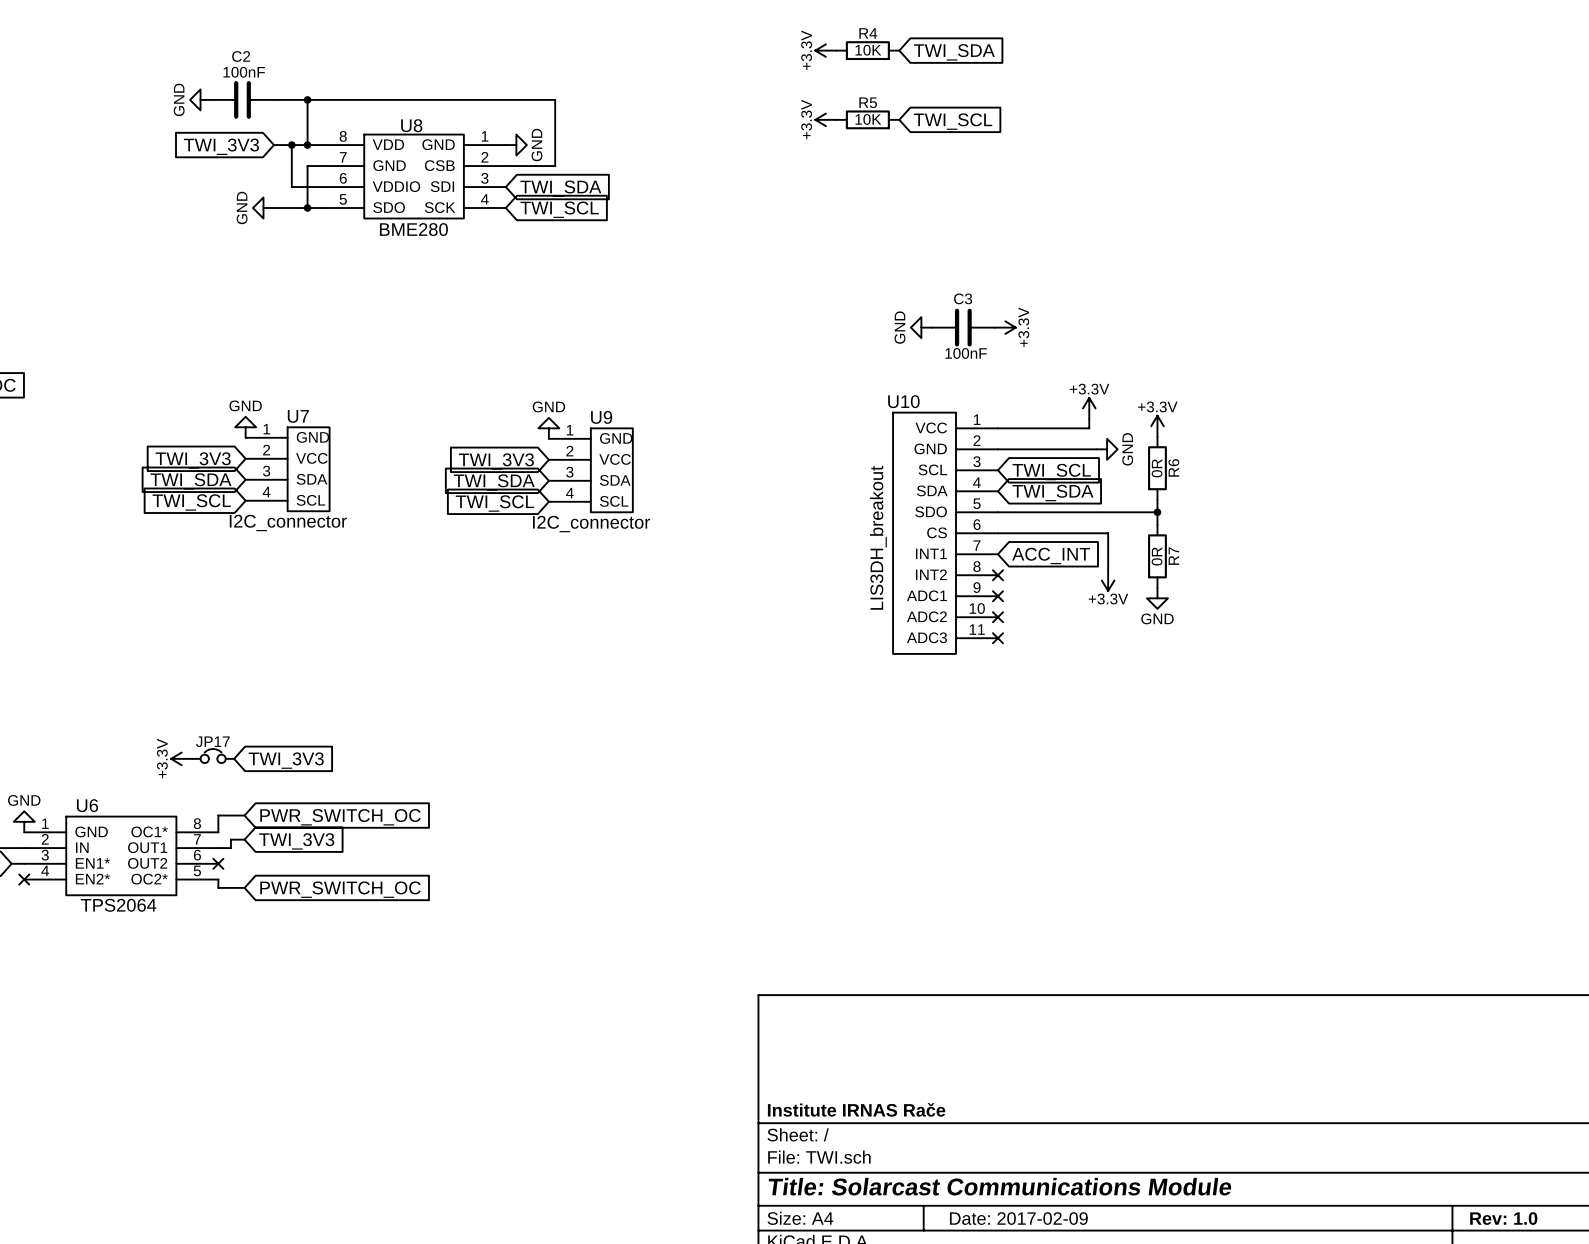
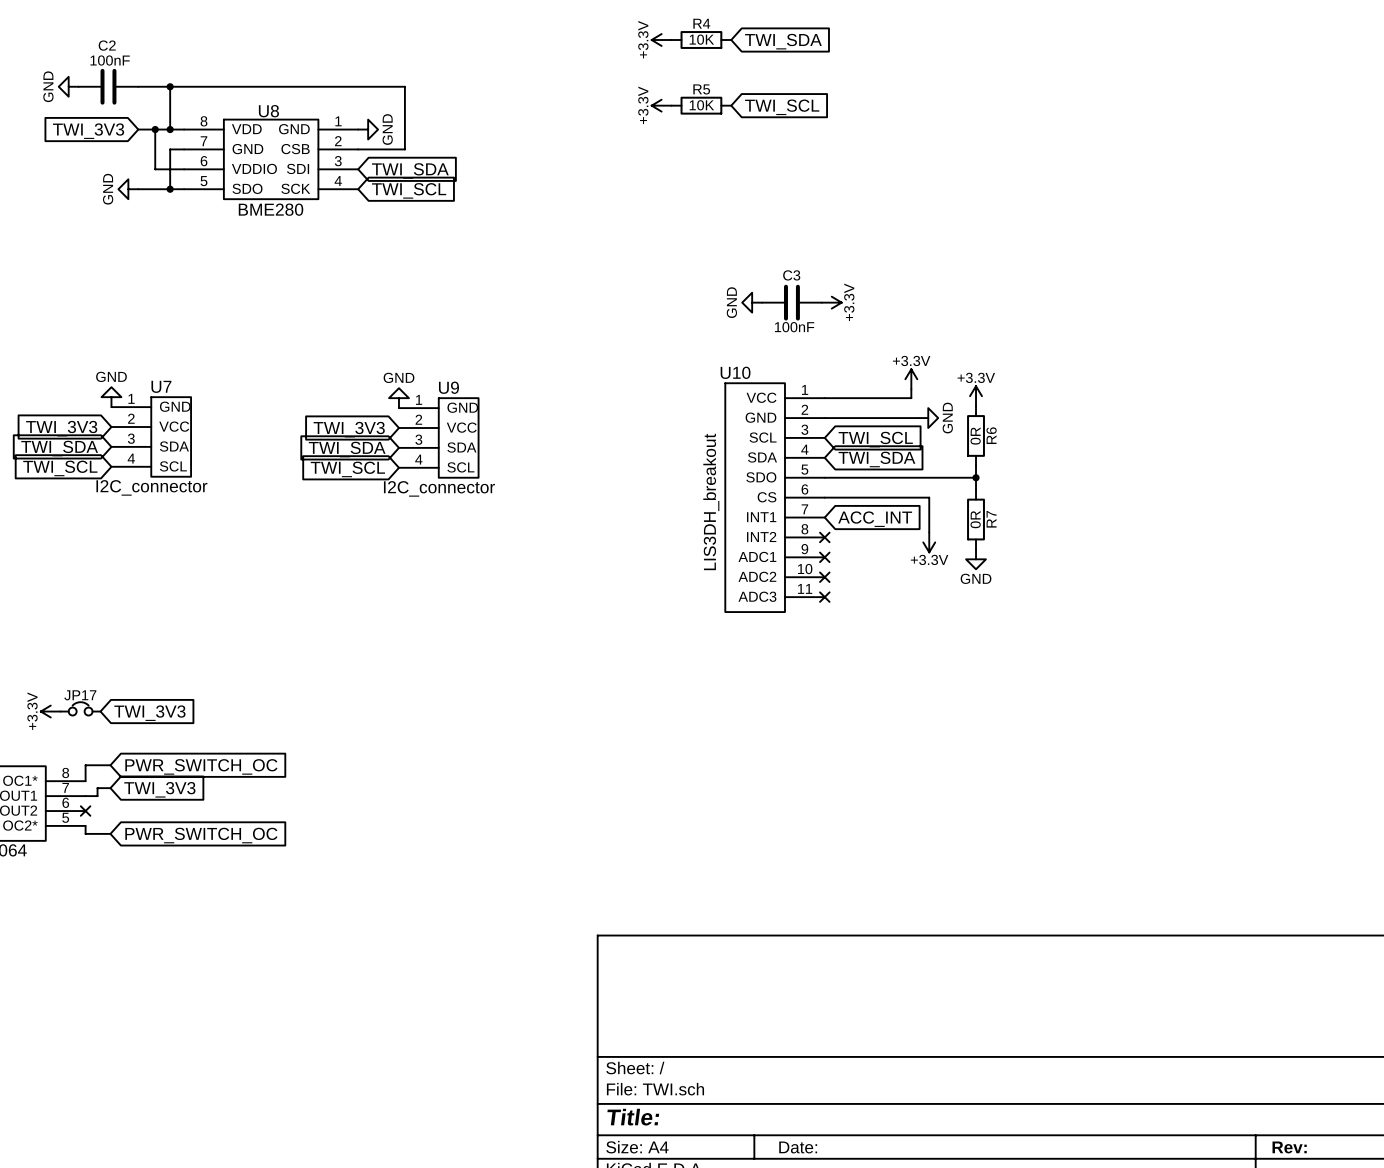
title block: Institute IRNAS Rače (856, 1109) -> none
title block: Title: Solarcast Communications Module (1000, 1186) -> Title: (633, 1117)
title block: Date: 2017-02-09 (1018, 1218) -> Date: (798, 1147)
title block: Rev: 1.0 (1503, 1218) -> Rev: (1289, 1147)

